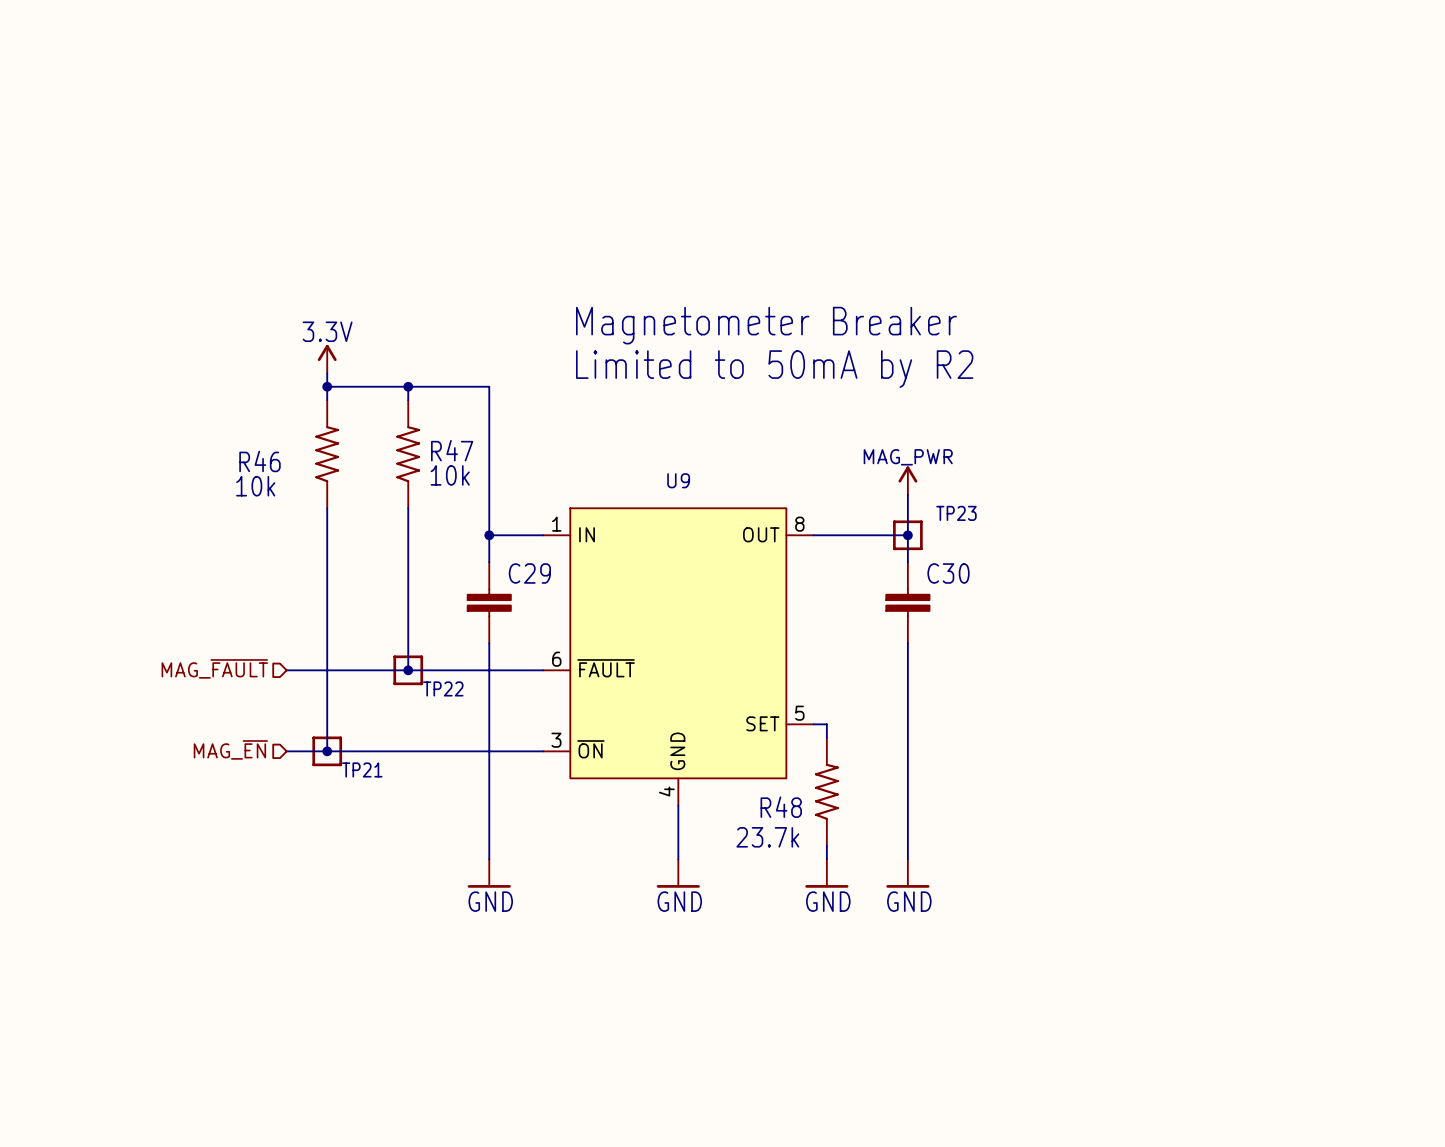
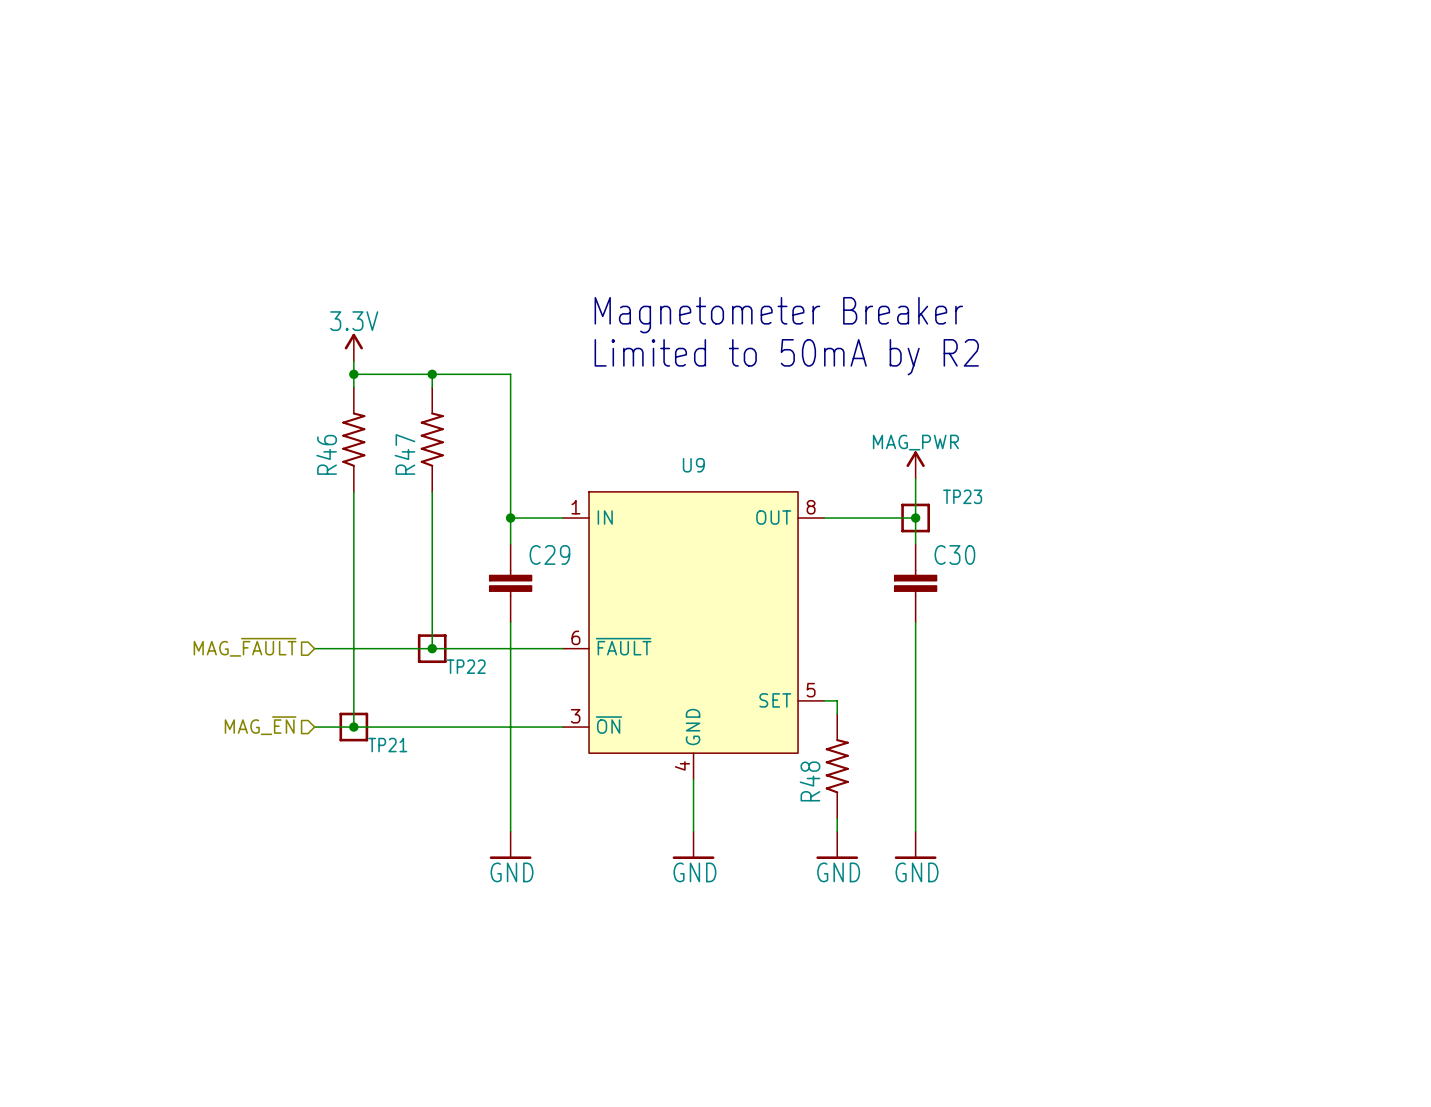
R47 name rotation: 0° (452, 450) -> 90° counterclockwise (404, 454)
R47 name position: R47 (452, 450) -> R47 (404, 454)
R46 name rotation: 0° (259, 461) -> 90° counterclockwise (326, 454)
R47 value: 10k (450, 475) -> none
R46 value: 10k (255, 486) -> none
R48 name rotation: 0° (781, 807) -> 90° counterclockwise (810, 781)
R48 value: 23.7k (767, 837) -> none

